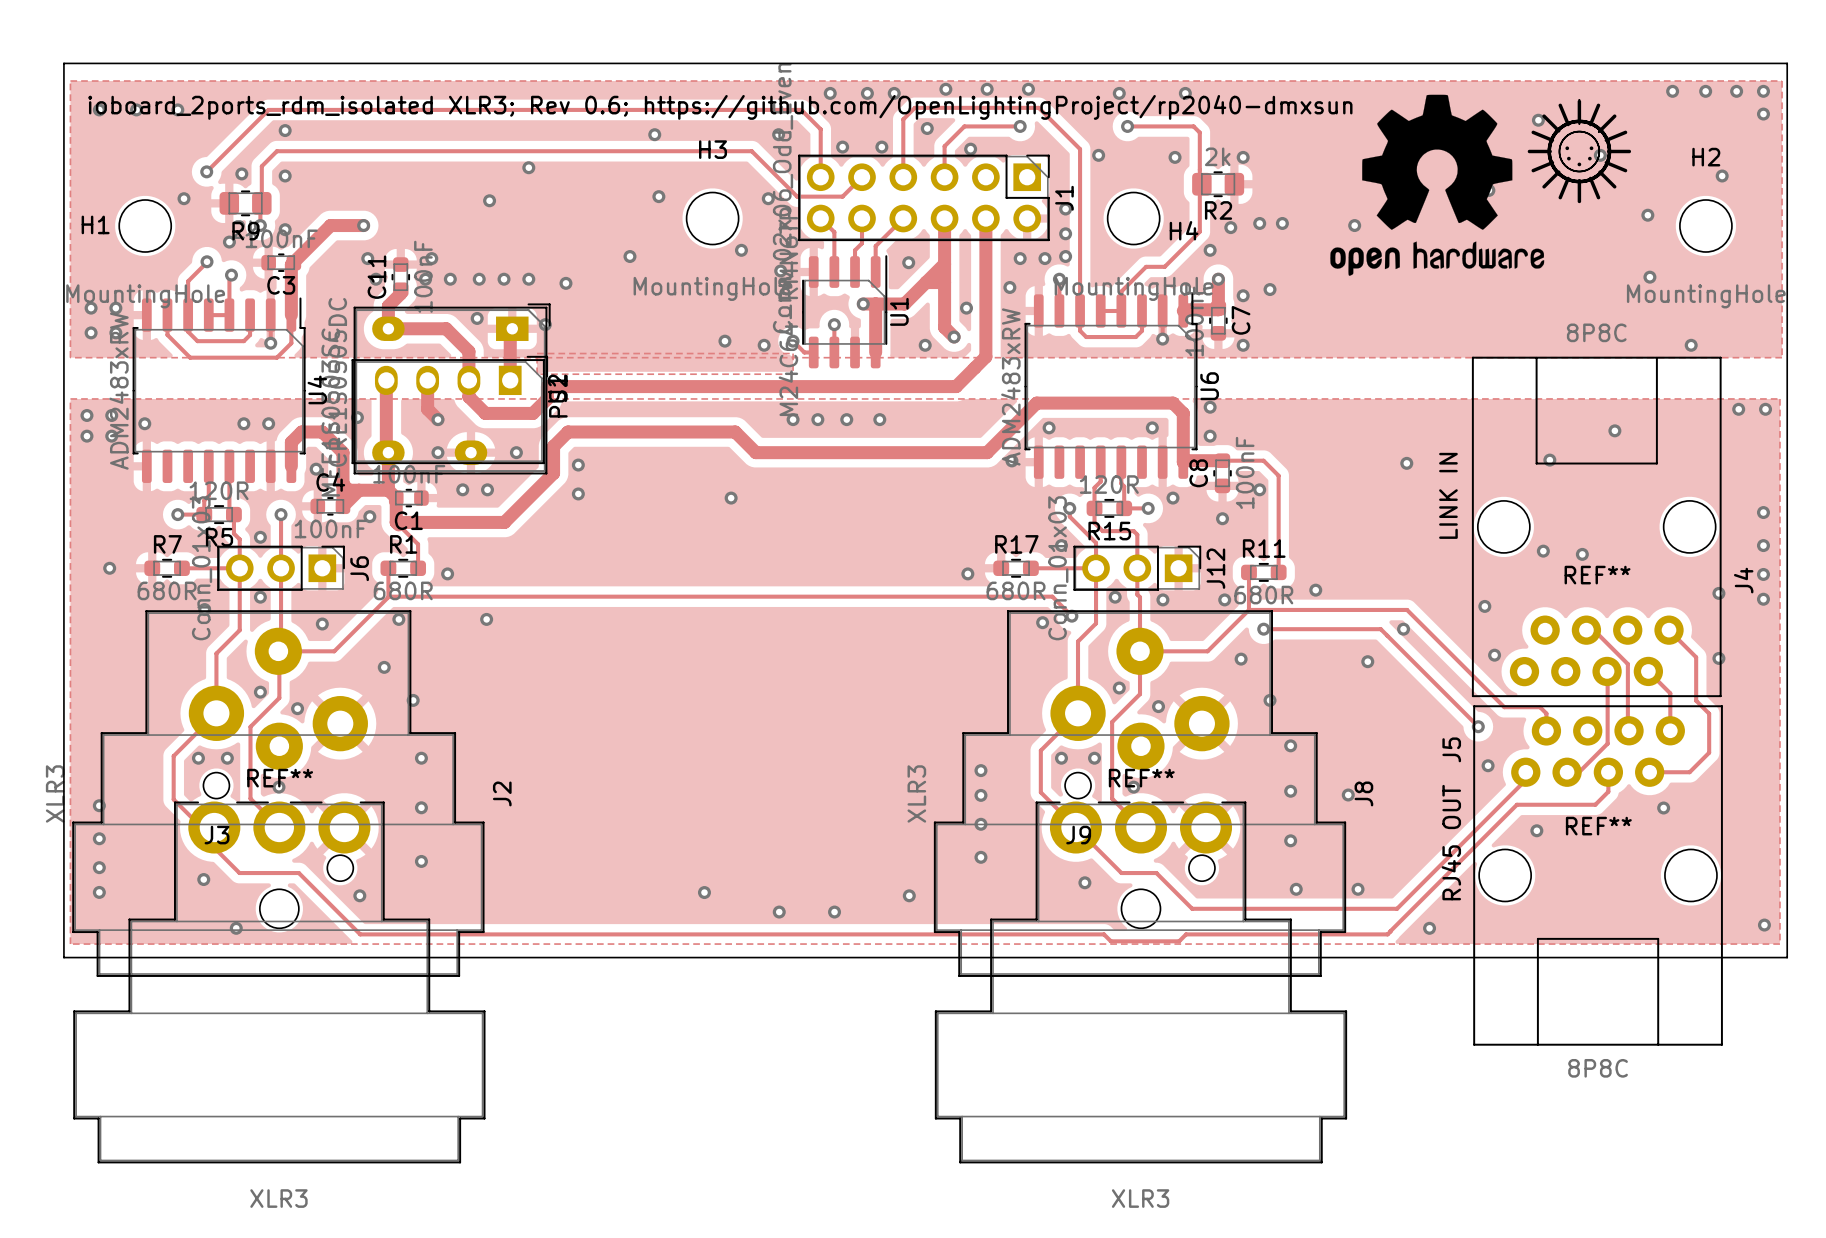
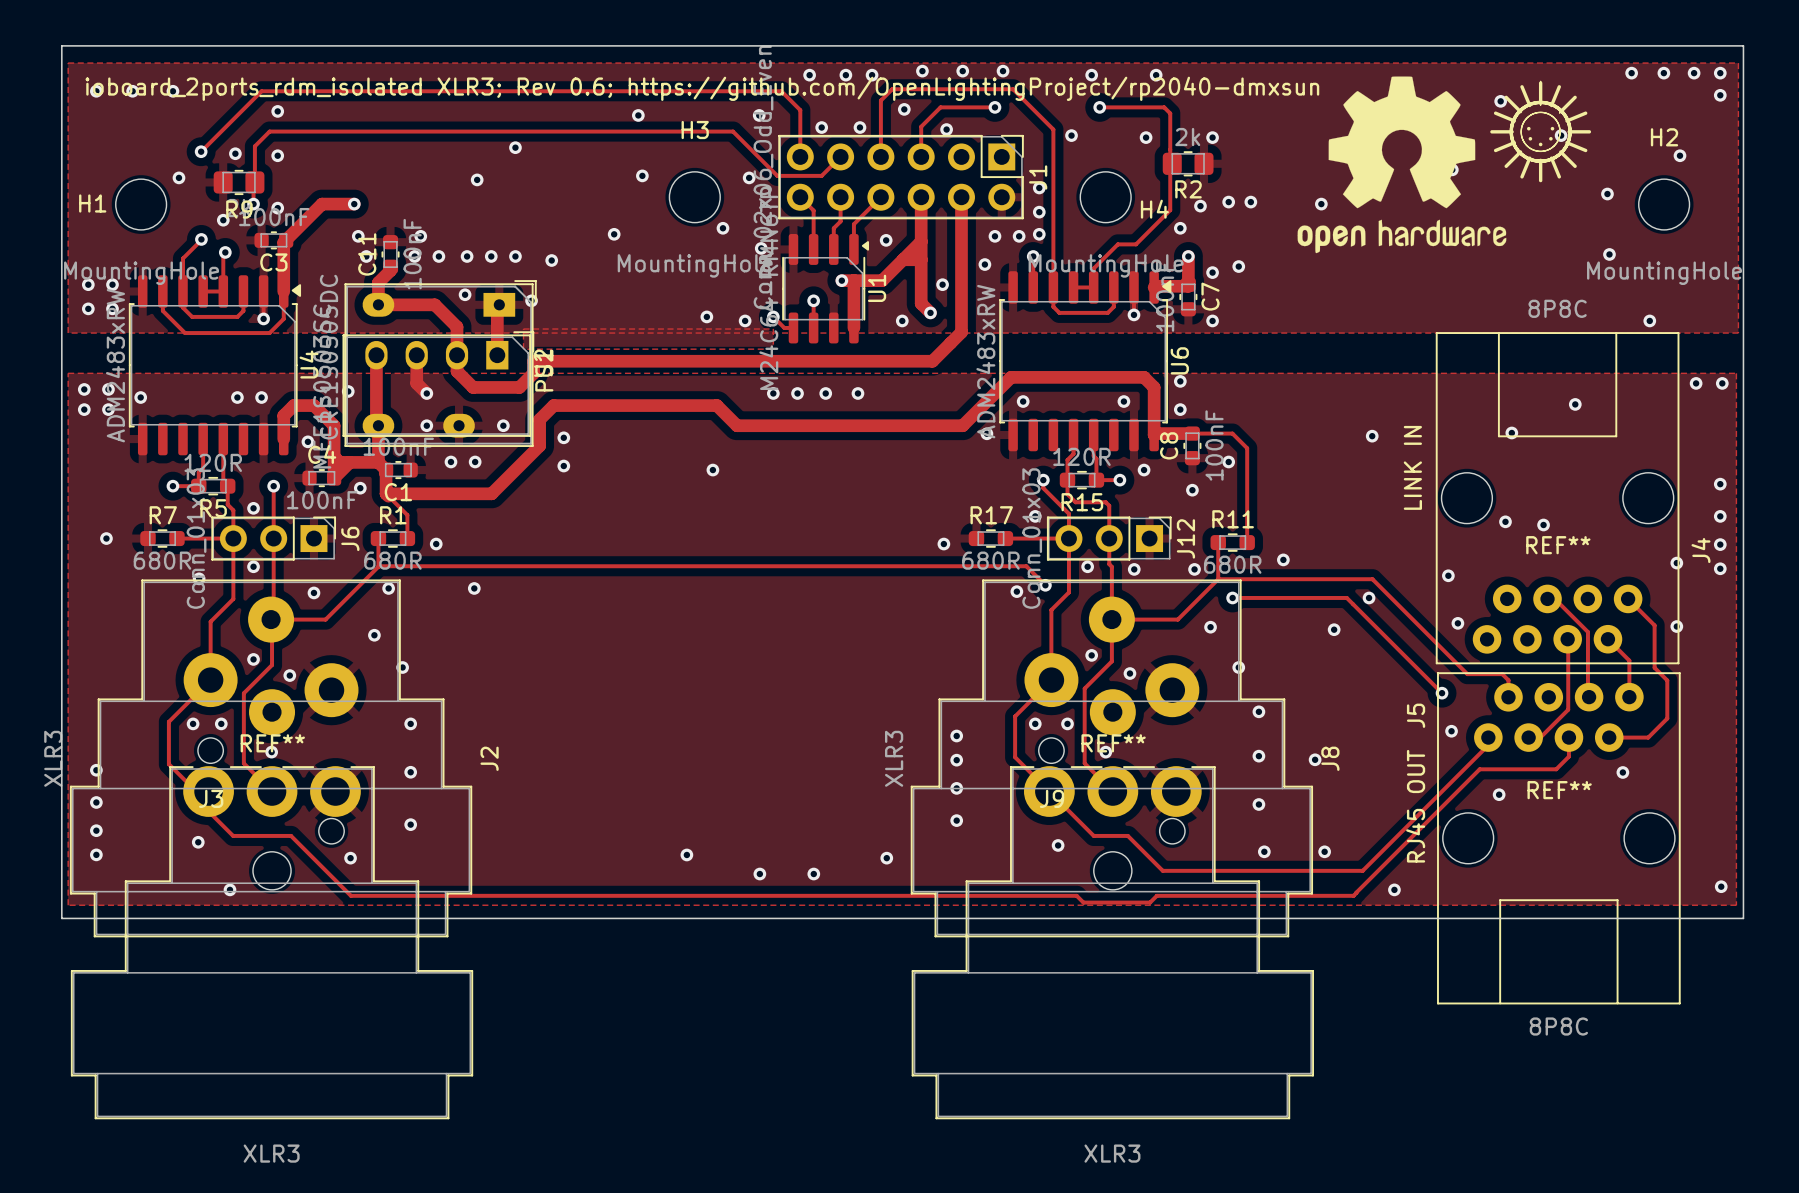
U1 footprint: [802, 255, 888, 369] -> [782, 233, 870, 344]
U6 footprint: [1024, 293, 1198, 479] -> [999, 271, 1172, 452]
U4 footprint: [132, 297, 306, 483] -> [128, 275, 302, 456]

